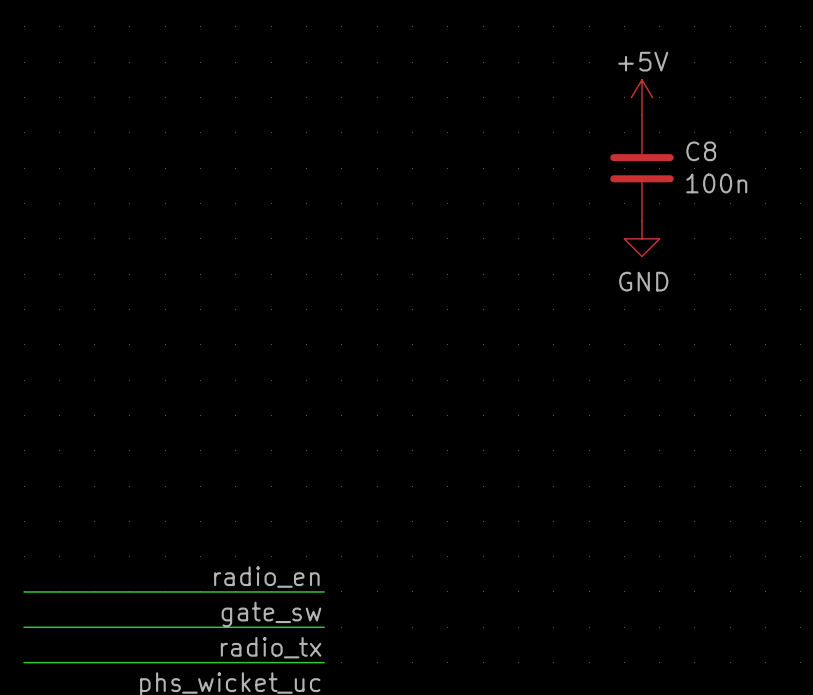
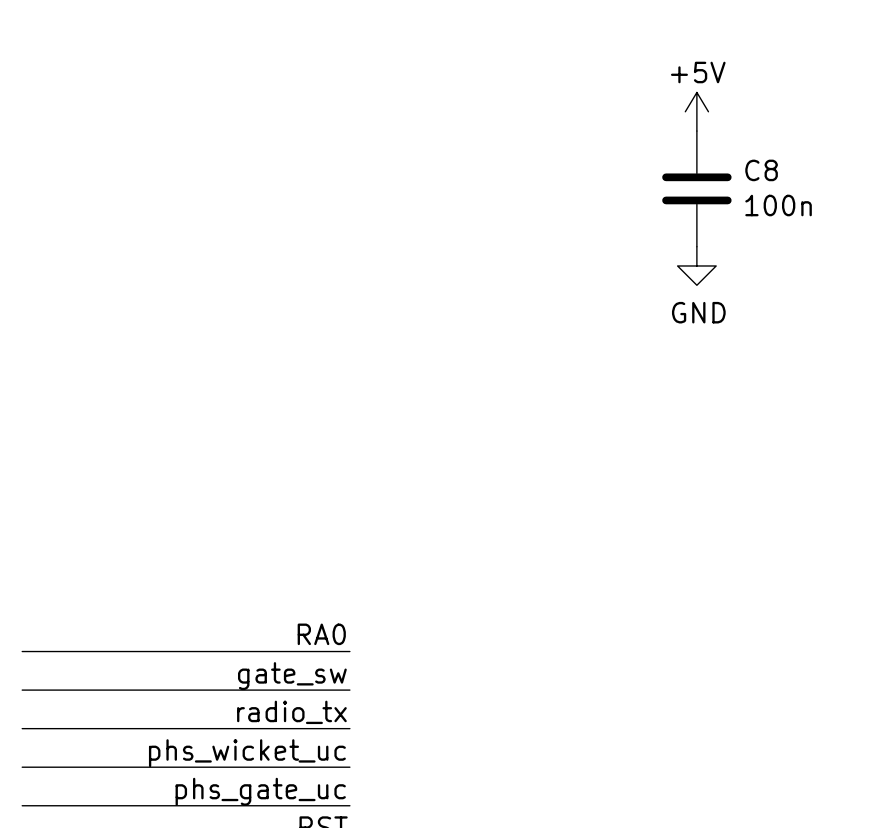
label: radio_en (266, 577) -> RA0 (321, 634)

